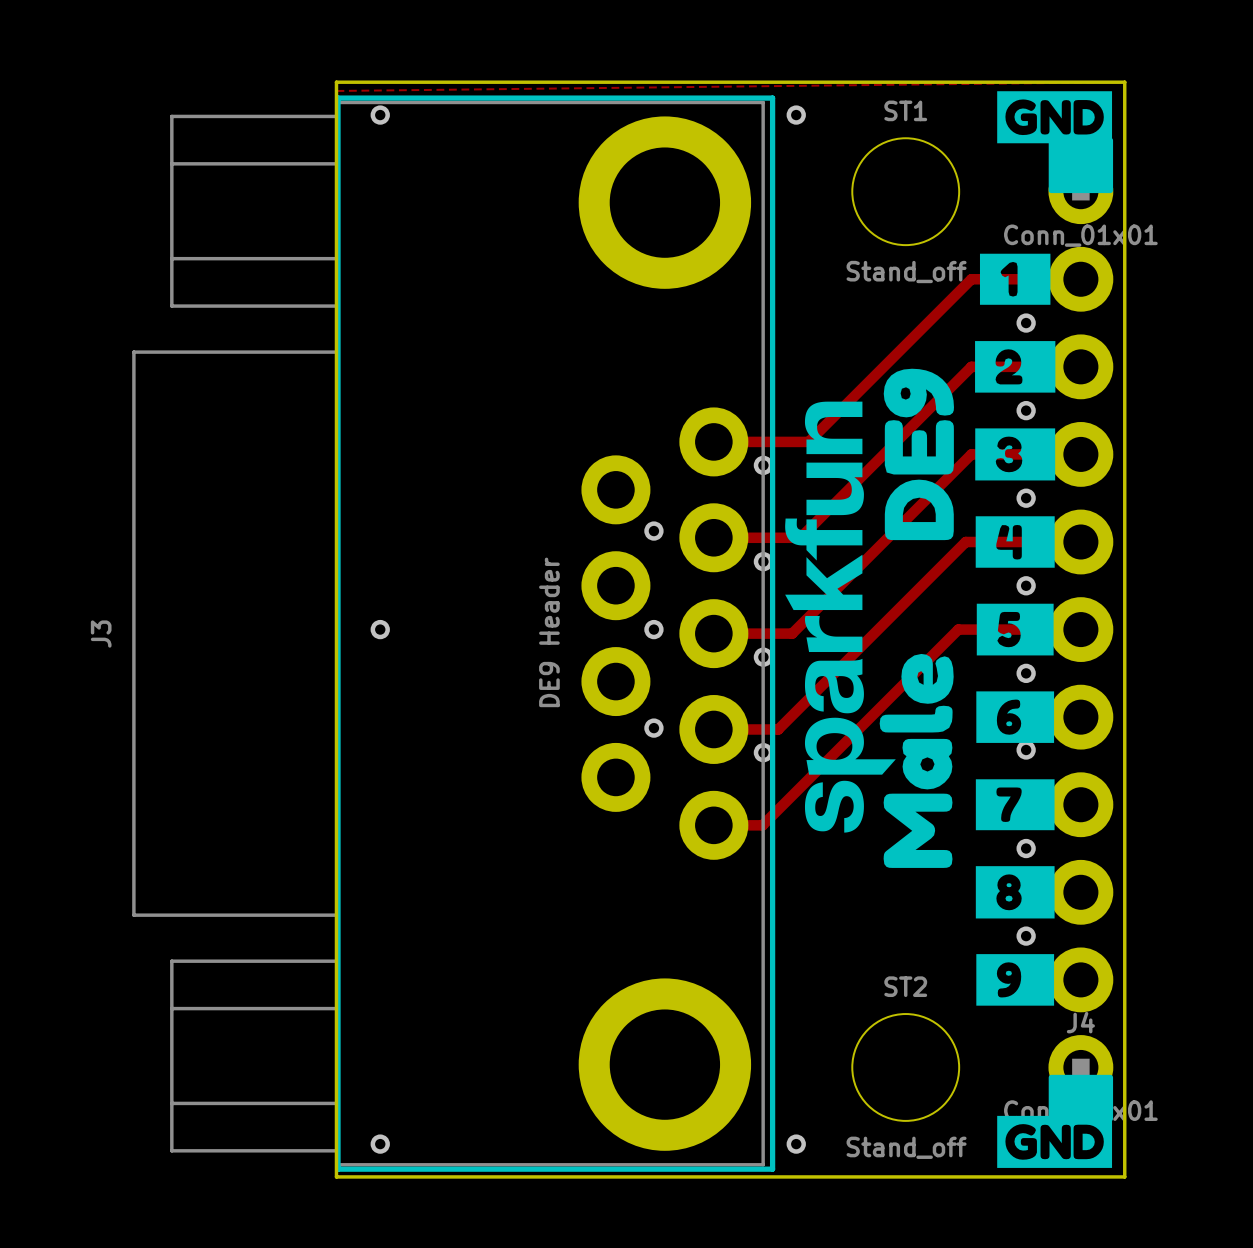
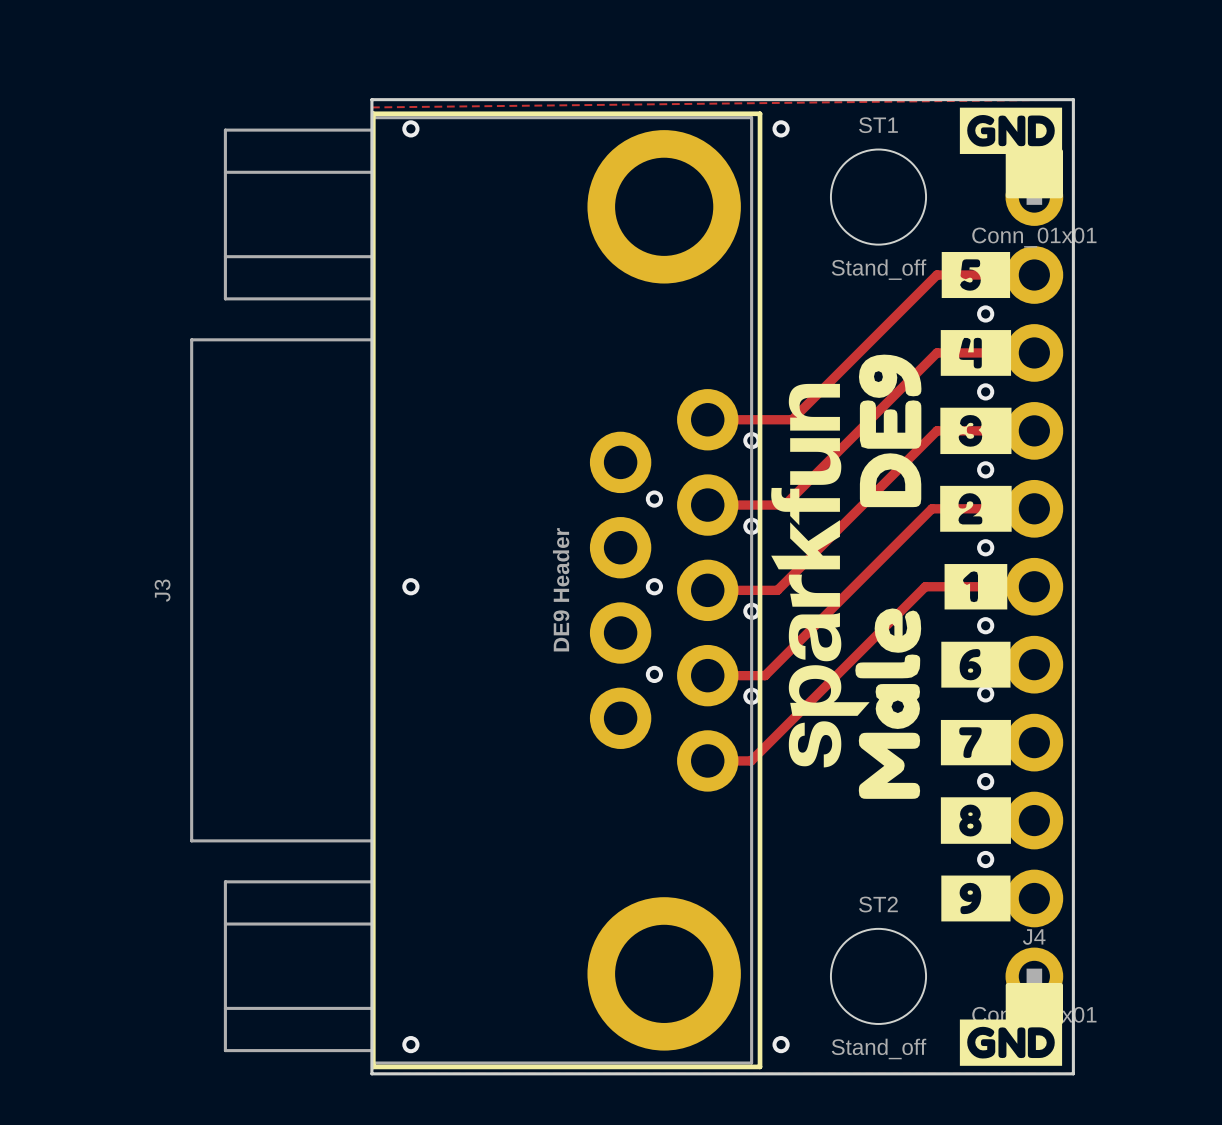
drawing position: (1015, 279) -> (975, 586)
drawing position: (1015, 366) -> (975, 508)
drawing position: (1015, 542) -> (975, 352)
drawing position: (1015, 629) -> (975, 275)

